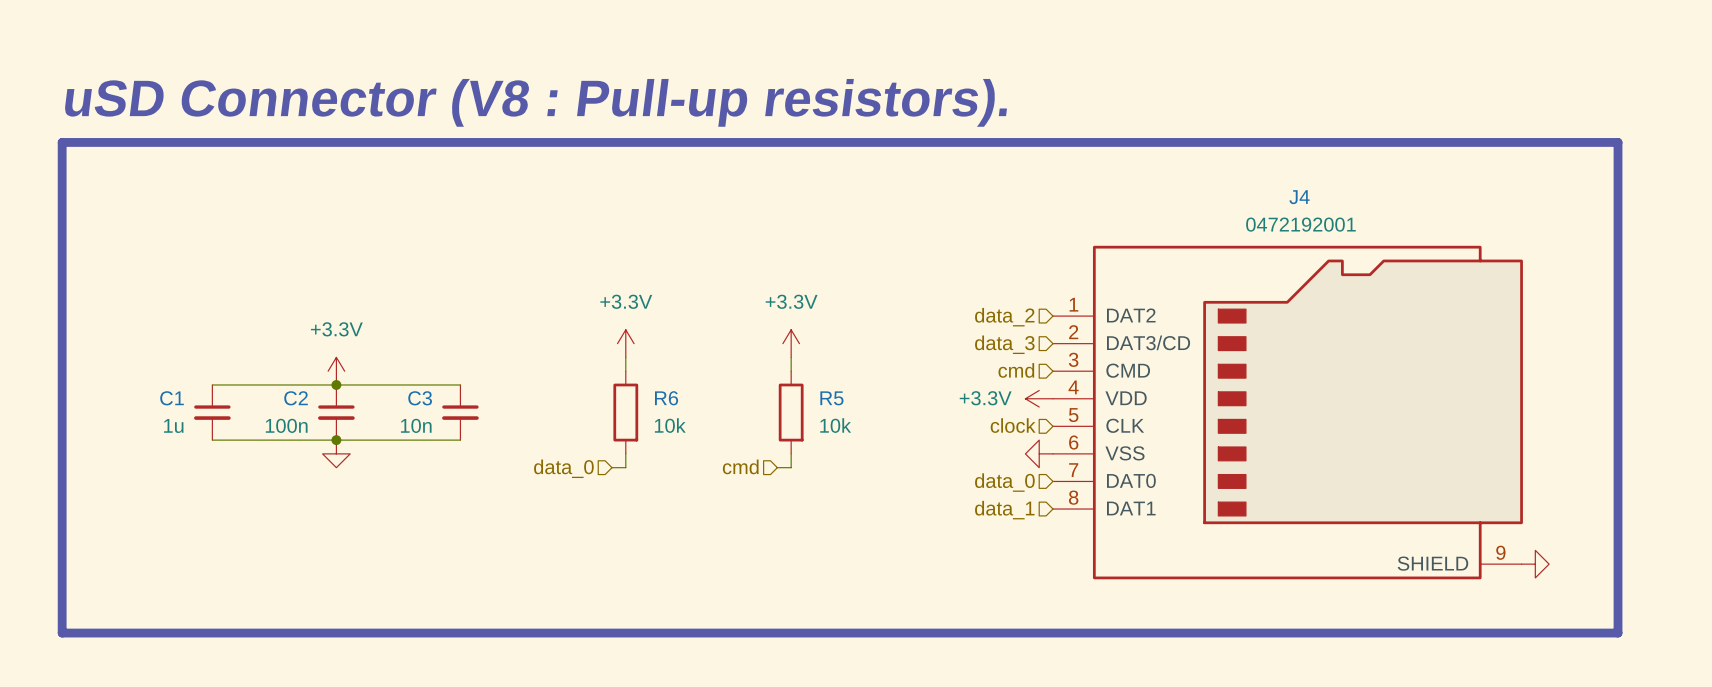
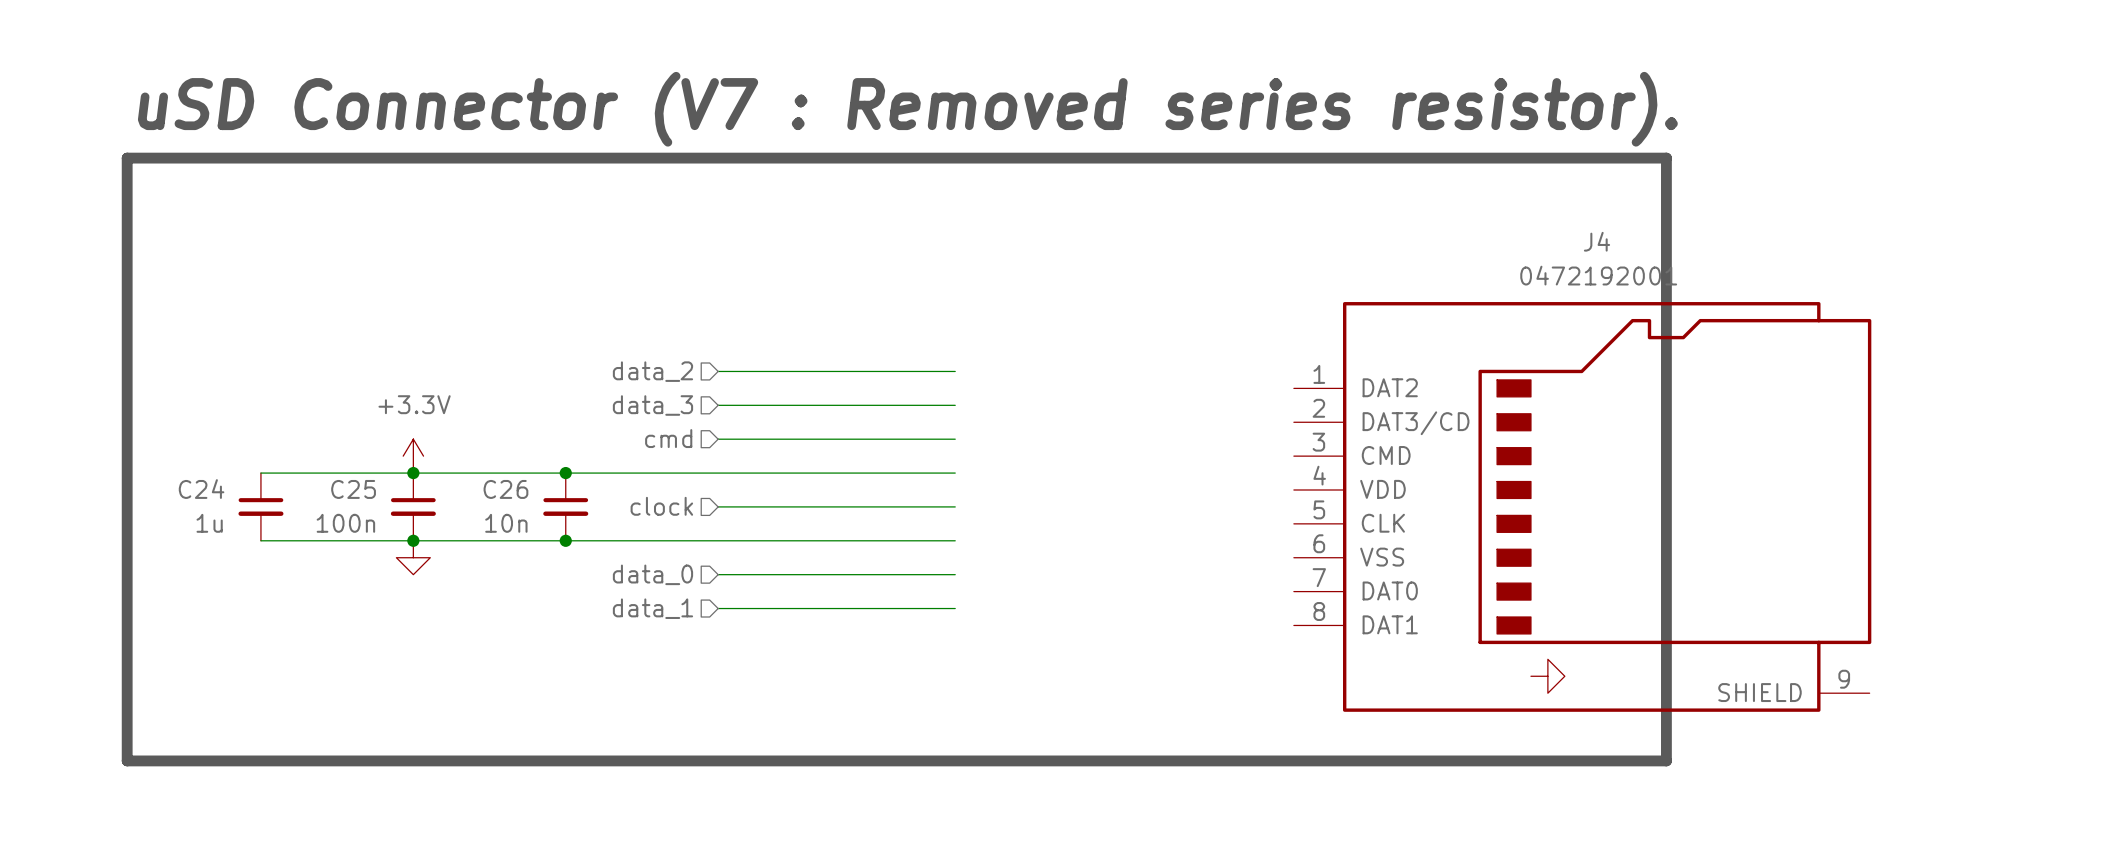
text: uSD Connector (V8 : Pull-up resistors). (535, 102) -> uSD Connector (V7 : Removed series resistor). (907, 109)
line: (62, 142) (1618, 142) (1618, 633) (62, 633) (62, 142) -> (127, 158) (127, 760) (1666, 760) (1666, 158) (127, 158)
wire: none -> (718, 371) (955, 371)
hierarchical label: none -> data_2 (652, 371)
hierarchical label: data_2 (1004, 317) -> none
wire: none -> (718, 405) (955, 405)
hierarchical label: none -> data_3 (652, 405)
power symbol: +3.3V (625, 343) -> none
power symbol: +3.3V (791, 343) -> none
hierarchical label: data_3 (1004, 344) -> none
wire: none -> (718, 439) (955, 439)
wire: (625, 357) (625, 371) -> none
wire: (791, 357) (791, 371) -> none
hierarchical label: cmd (1016, 370) -> none
wire: none -> (565, 473) (955, 473)
junction: none -> (565, 473)
C1 name: C1 (172, 398) -> C24 (201, 489)
C2 name: C2 (296, 398) -> C25 (353, 489)
C3 name: C3 (420, 398) -> C26 (505, 489)
power symbol: +3.3V (1039, 398) -> none
hierarchical label: none -> clock (661, 506)
wire: none -> (718, 506) (955, 506)
R6: 10k (625, 412) -> none
R5: 10k (791, 412) -> none
hierarchical label: clock (1013, 425) -> none
wire: none -> (565, 540) (955, 540)
junction: none -> (565, 540)
wire: (625, 453) (625, 467) -> (955, 574) (768, 574)
wire: (791, 453) (791, 467) (777, 467) -> none
power symbol: (1039, 453) -> none
hierarchical label position: cmd (740, 466) -> cmd (668, 438)
wire: none -> (718, 574) (752, 574)
hierarchical label position: data_0 (563, 468) -> data_0 (652, 574)
hierarchical label: data_0 (1004, 482) -> none
wire: none -> (718, 608) (955, 608)
hierarchical label: none -> data_1 (652, 608)
hierarchical label: data_1 (1004, 510) -> none
power symbol: none -> (1547, 676)
power symbol: (1535, 564) -> none

